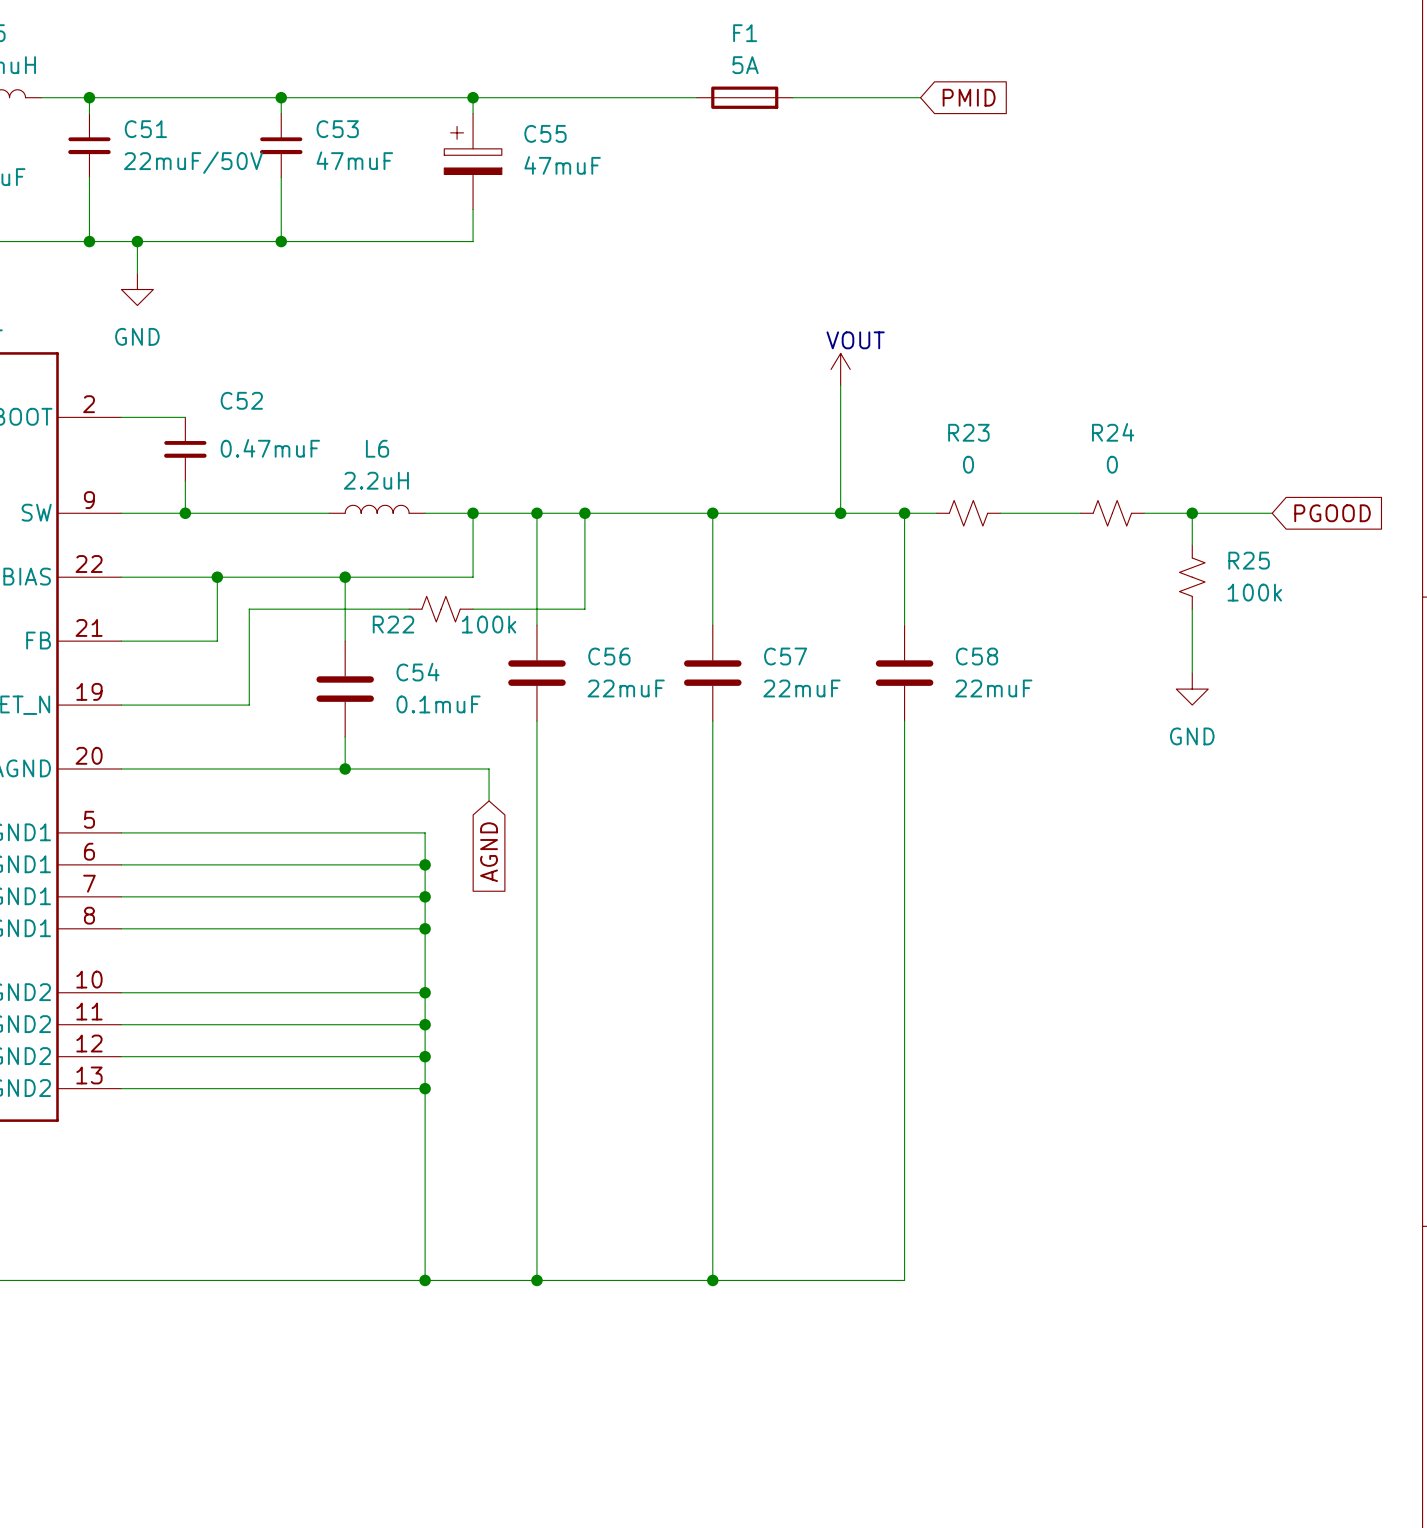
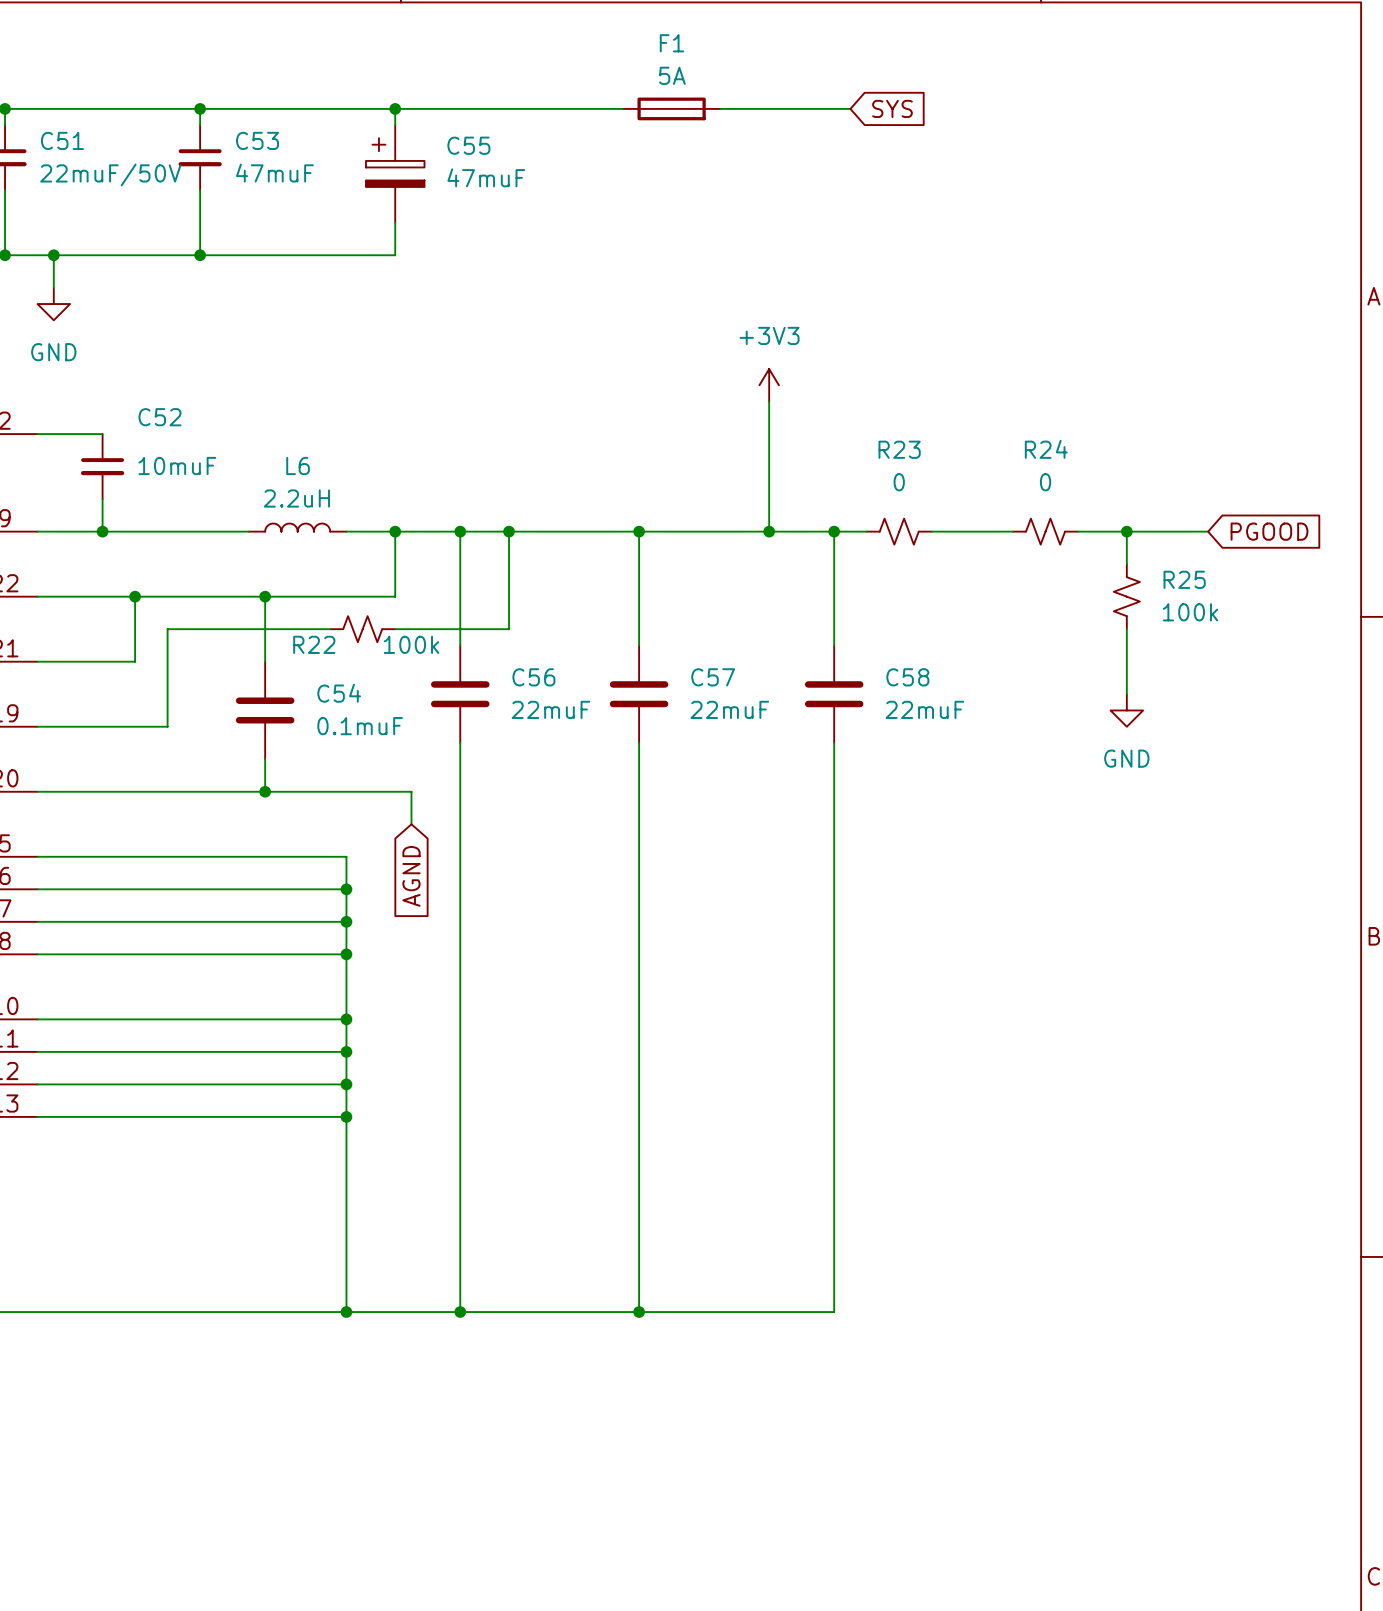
global label: PMID (969, 97) -> SYS (892, 108)
power symbol text: none -> +3V3 (769, 335)
text: VOUT (855, 340) -> none
C52 value: 0.47muF (270, 448) -> 10muF (177, 466)

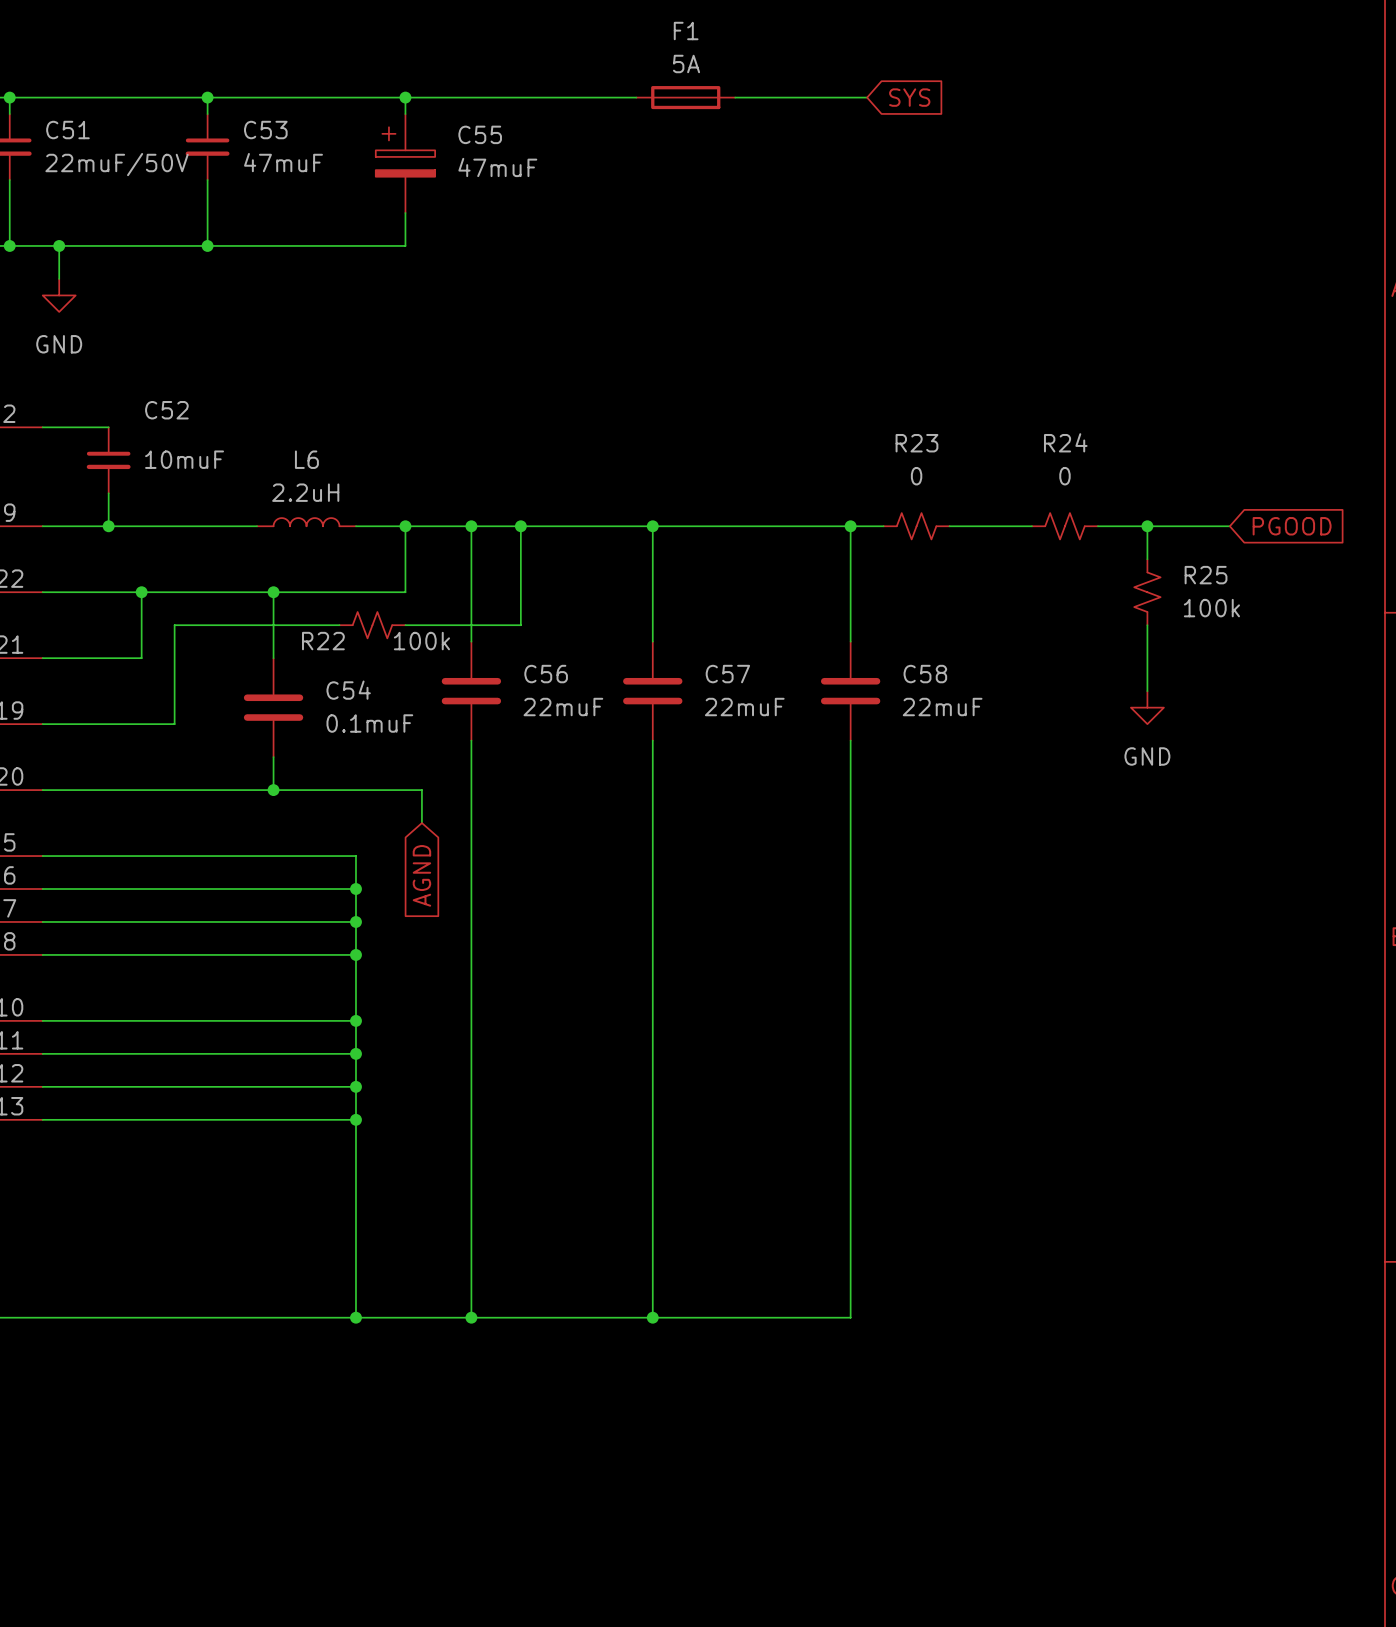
power symbol: +3V3 (769, 385) -> none
wire: (769, 401) (769, 531) -> none
junction: (769, 531) -> none

